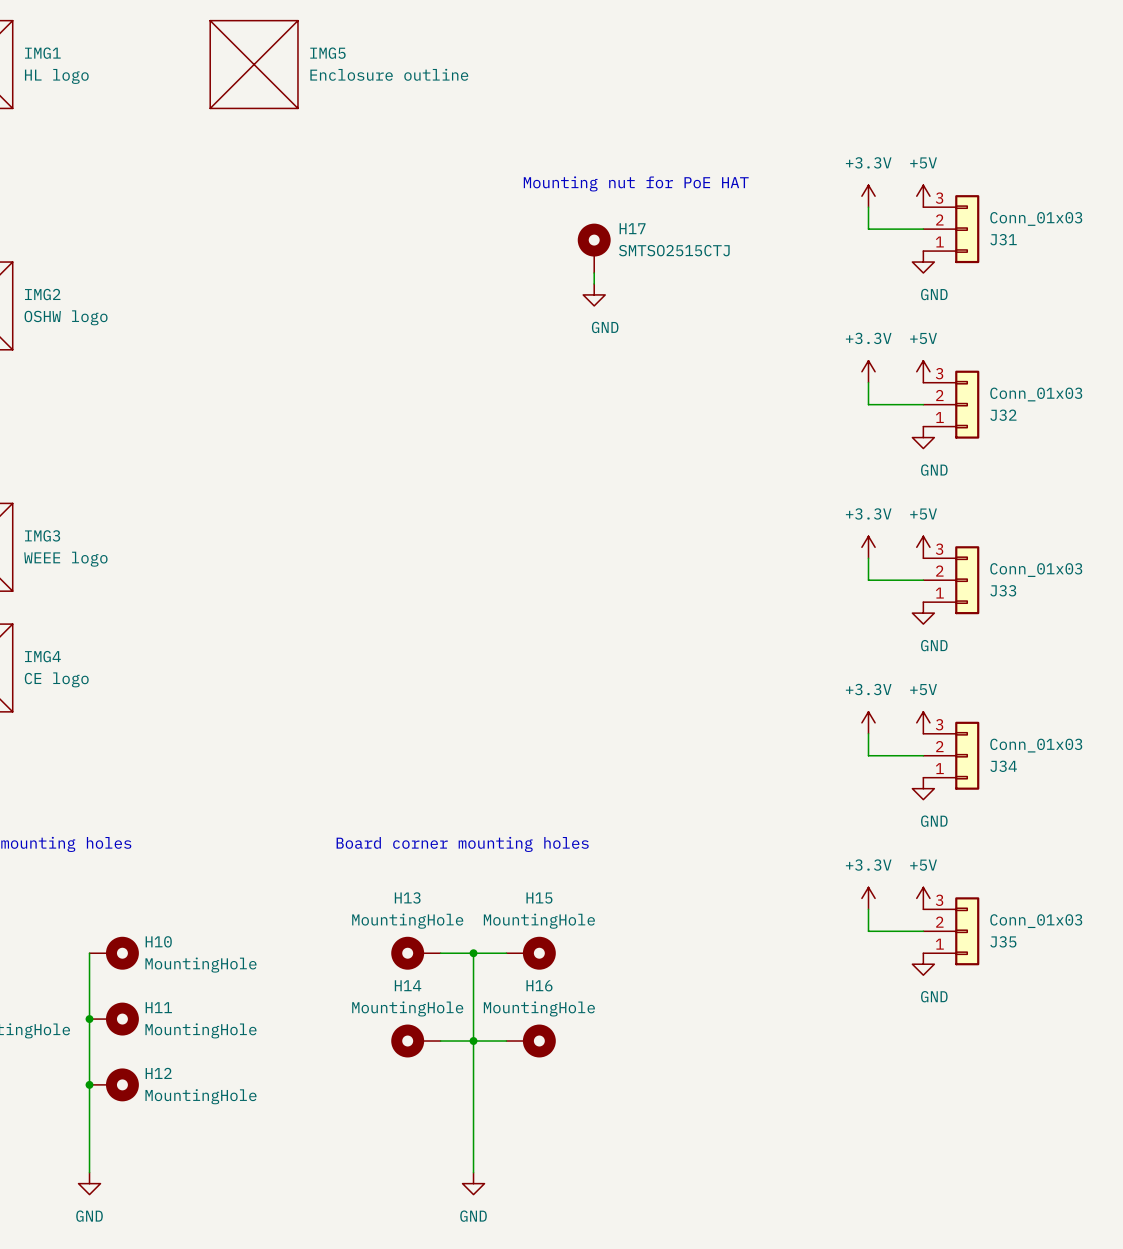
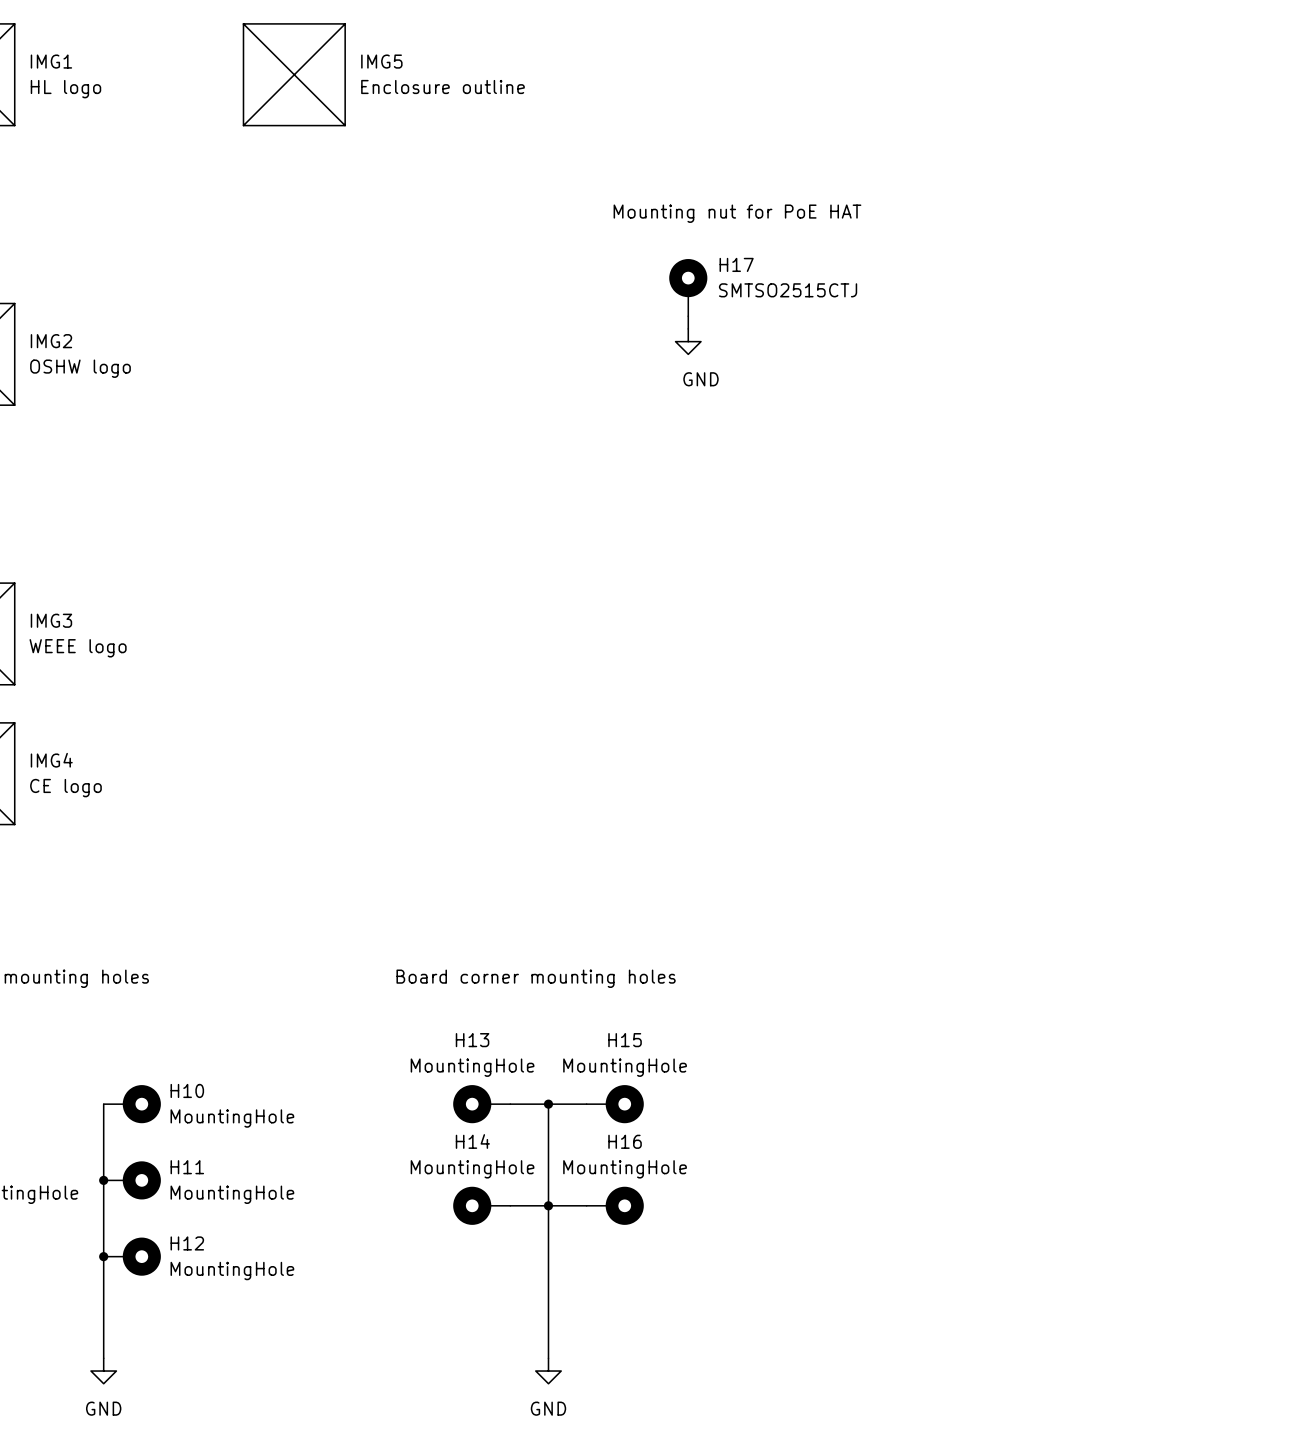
power symbol: +3.3V (868, 196) -> none
power symbol: +5V (923, 196) -> none
wire: (868, 207) (868, 229) (923, 229) -> none
J31: Conn_01x03 (951, 229) -> none
power symbol: GND (923, 262) -> none
power symbol: +3.3V (868, 371) -> none
power symbol: +5V (923, 371) -> none
wire: (868, 382) (868, 404) (923, 404) -> none
J32: Conn_01x03 (951, 404) -> none
power symbol: GND (923, 437) -> none
power symbol: +3.3V (868, 547) -> none
power symbol: +5V (923, 547) -> none
wire: (868, 558) (868, 580) (923, 580) -> none
J33: Conn_01x03 (951, 580) -> none
power symbol: GND (923, 613) -> none
power symbol: +3.3V (868, 722) -> none
power symbol: +5V (923, 722) -> none
wire: (868, 733) (868, 755) (923, 755) -> none
J34: Conn_01x03 (951, 755) -> none
power symbol: GND (923, 788) -> none
power symbol: +3.3V (868, 898) -> none
power symbol: +5V (923, 898) -> none
wire: (868, 909) (868, 931) (923, 931) -> none
J35: Conn_01x03 (951, 931) -> none
power symbol: GND (923, 964) -> none

